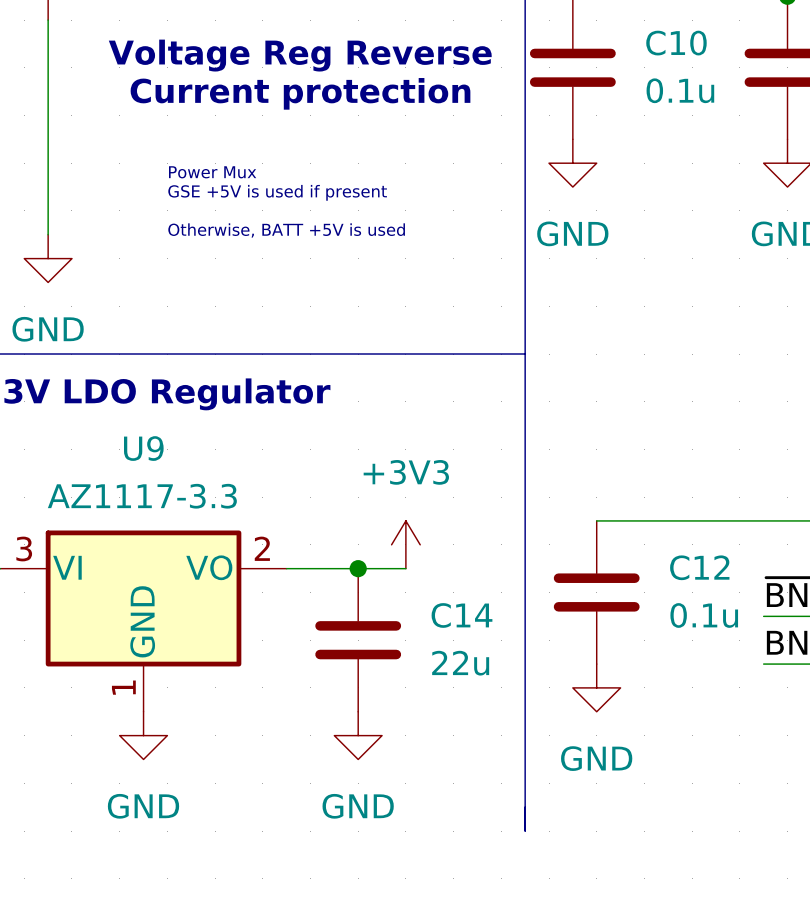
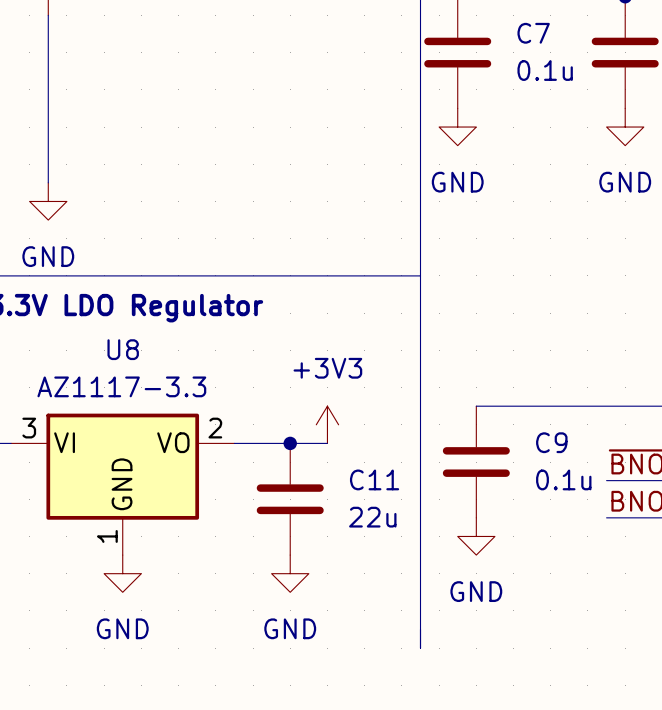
C10 name: C10 (676, 43) -> C7 (533, 33)
text: Voltage Reg Reverse (300, 55) -> none
text: Current protection (300, 93) -> none
text: Power Mux (212, 172) -> none
text: GSE +5V is used if present (277, 192) -> none
text: Otherwise, BATT +5V is used (286, 230) -> none
U9 name: U9 (143, 448) -> U8 (123, 349)
C12 name: C12 (699, 567) -> C9 (551, 442)
C14 name: C14 (461, 615) -> C11 (374, 479)

